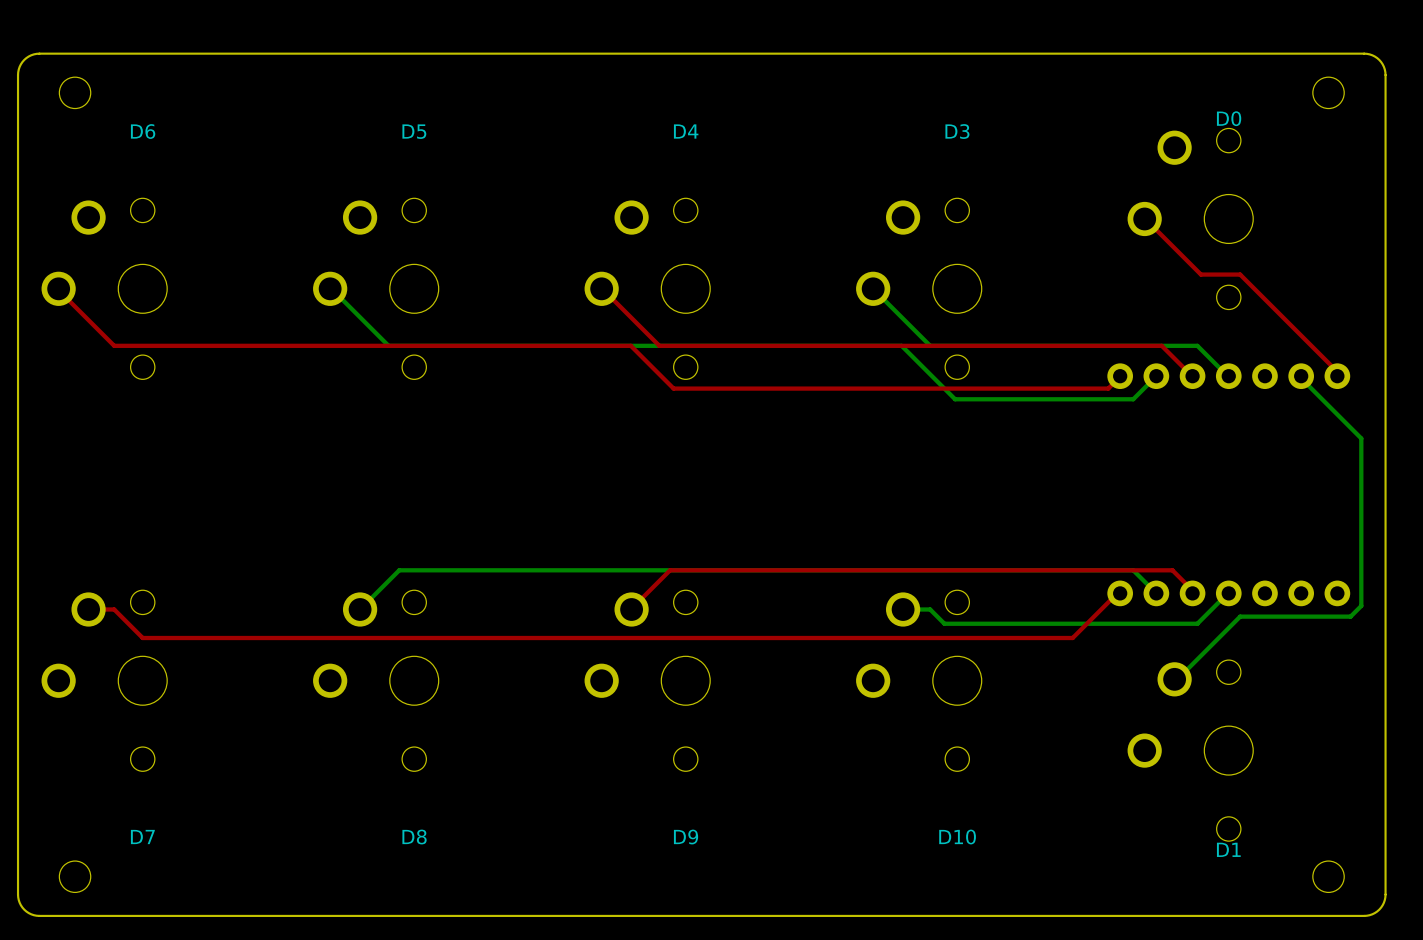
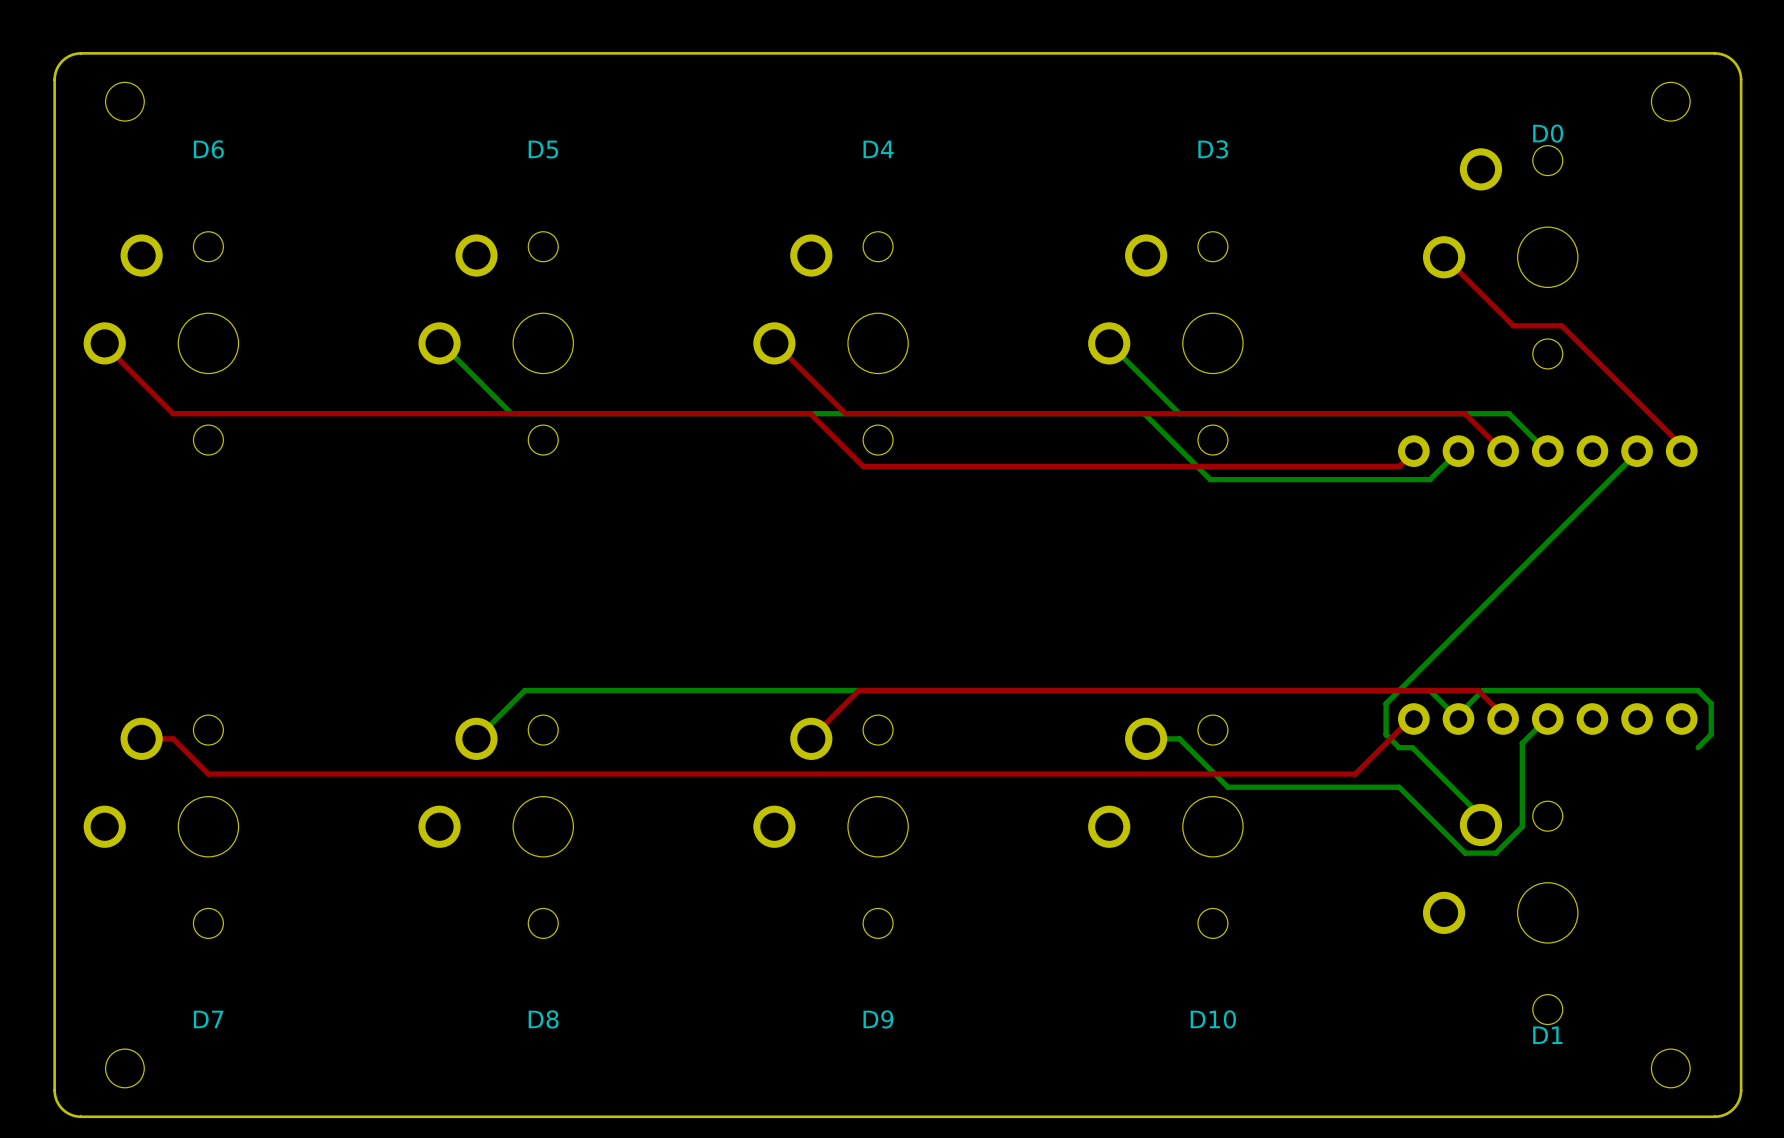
bottom track: (1300, 378) (1361, 438) (1361, 580) -> (1636, 453) (1386, 703) (1386, 734) (1399, 747) (1412, 747) (1482, 817) (1480, 817)
bottom track: none -> (1711, 703) (1698, 690) (1482, 690) (1457, 717)
bottom track: (1208, 613) (1197, 623) (944, 623) -> (1522, 743) (1522, 826) (1495, 853) (1465, 853) (1399, 787) (1227, 787) (1197, 756)
bottom track: (1350, 616) (1240, 616) (1176, 680) (1174, 679) -> none

